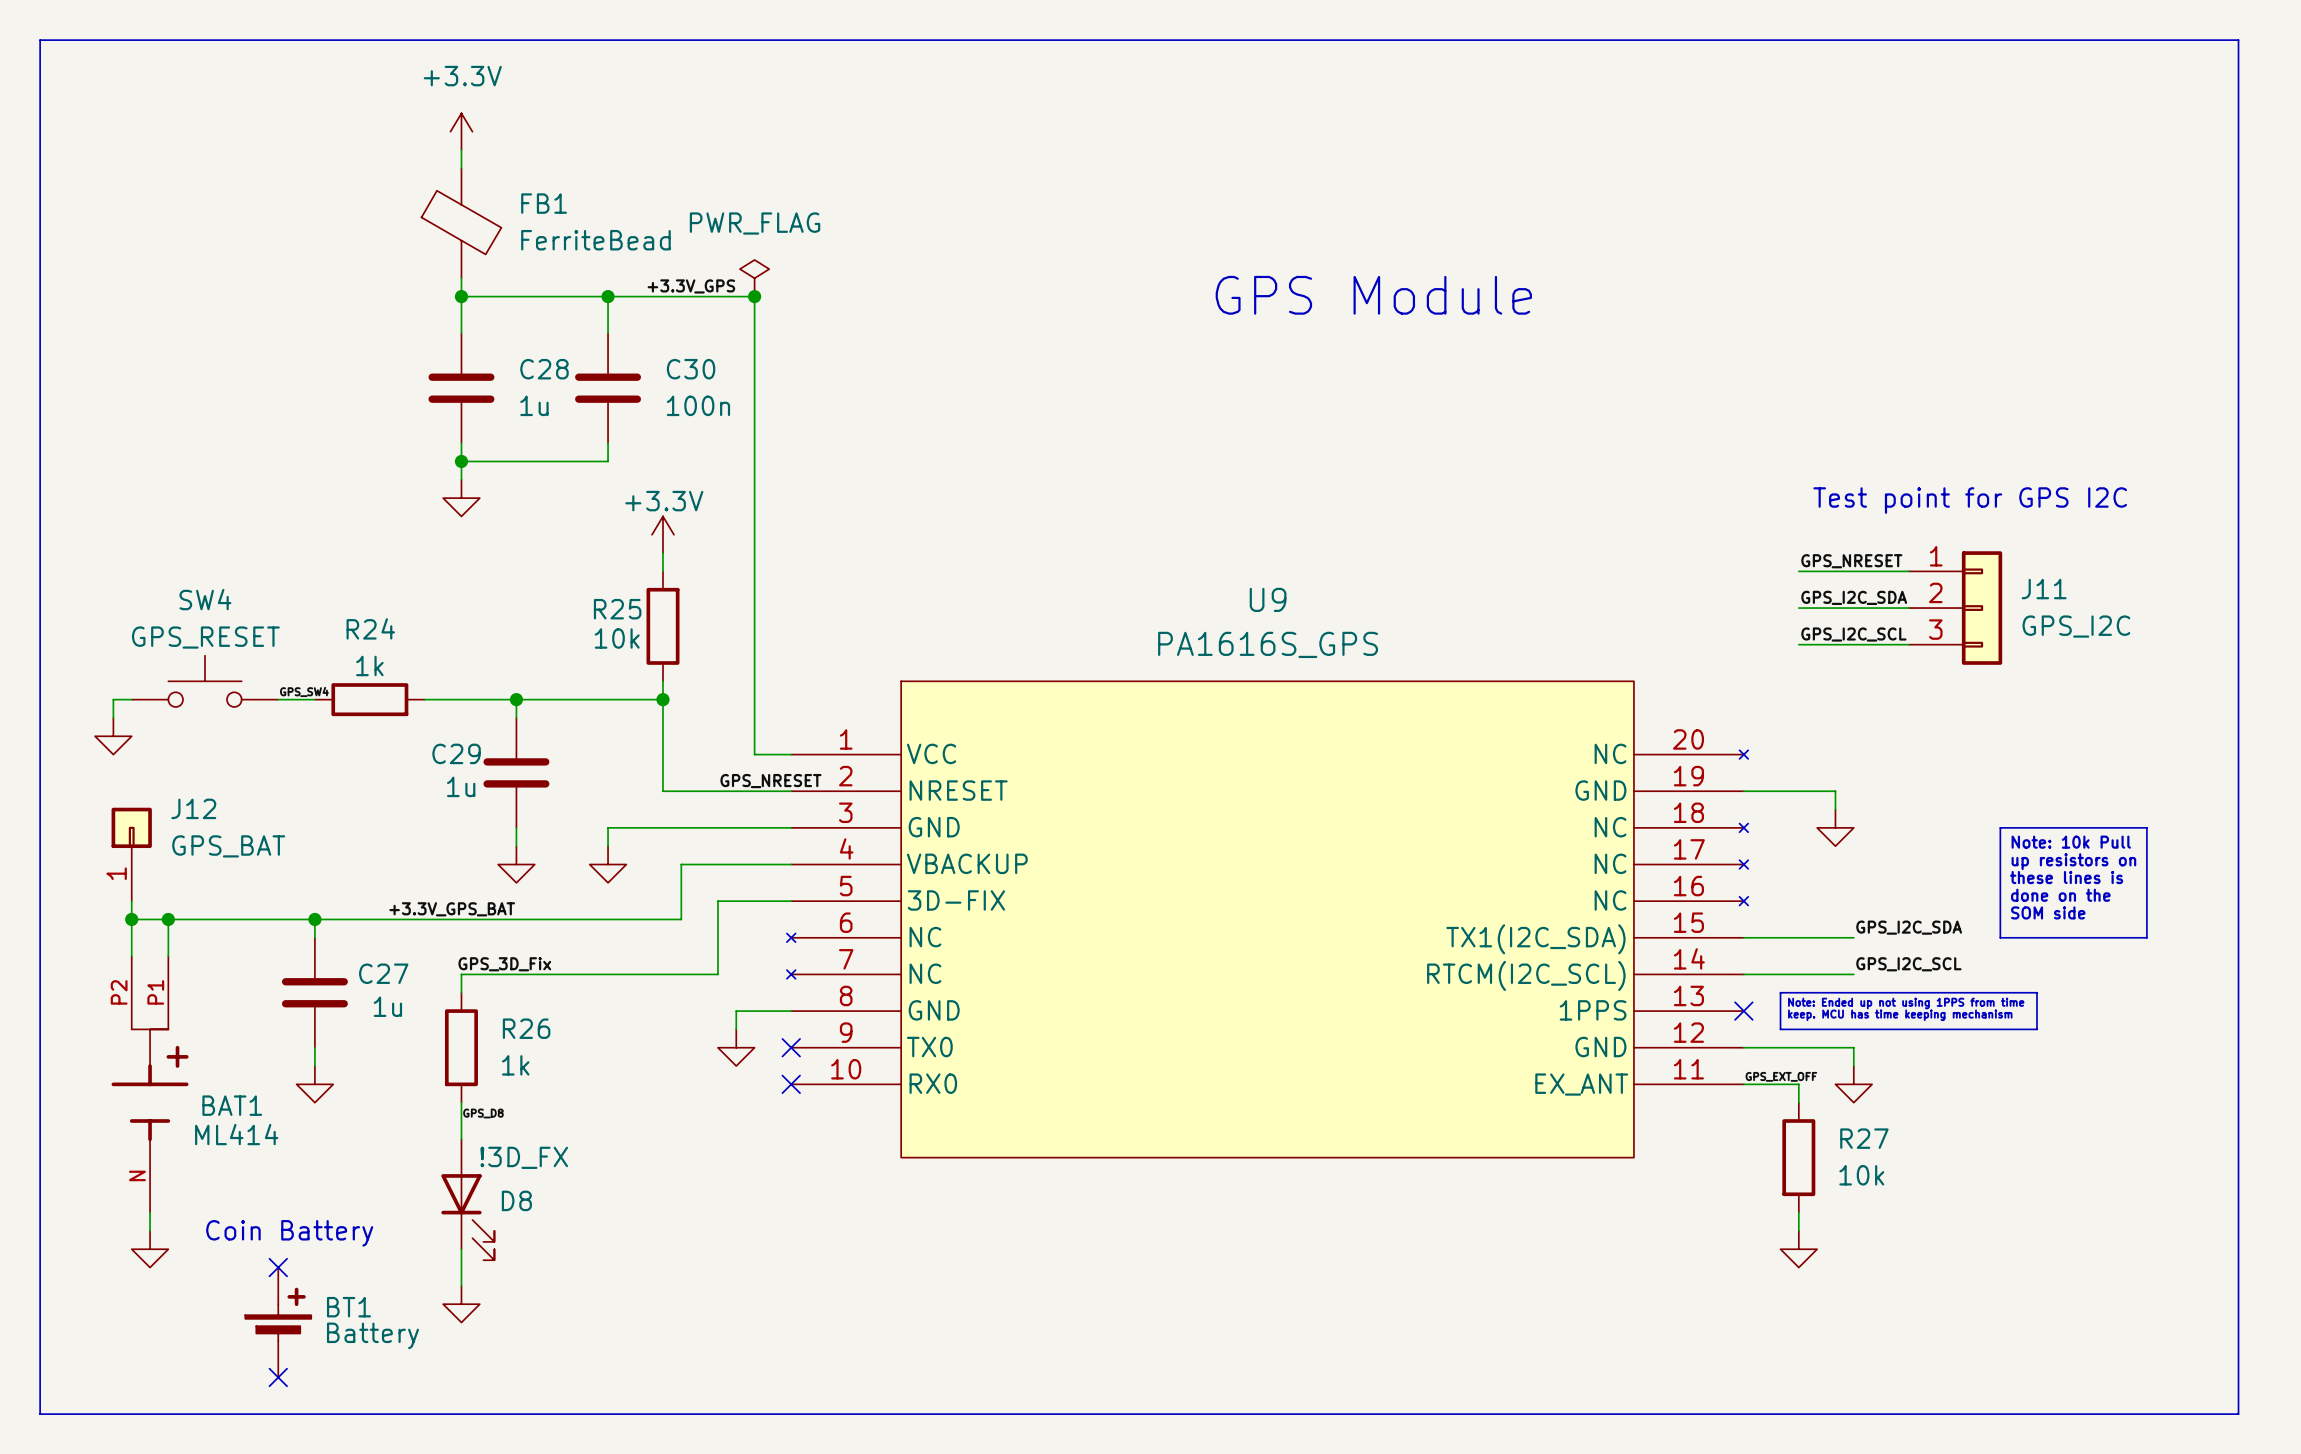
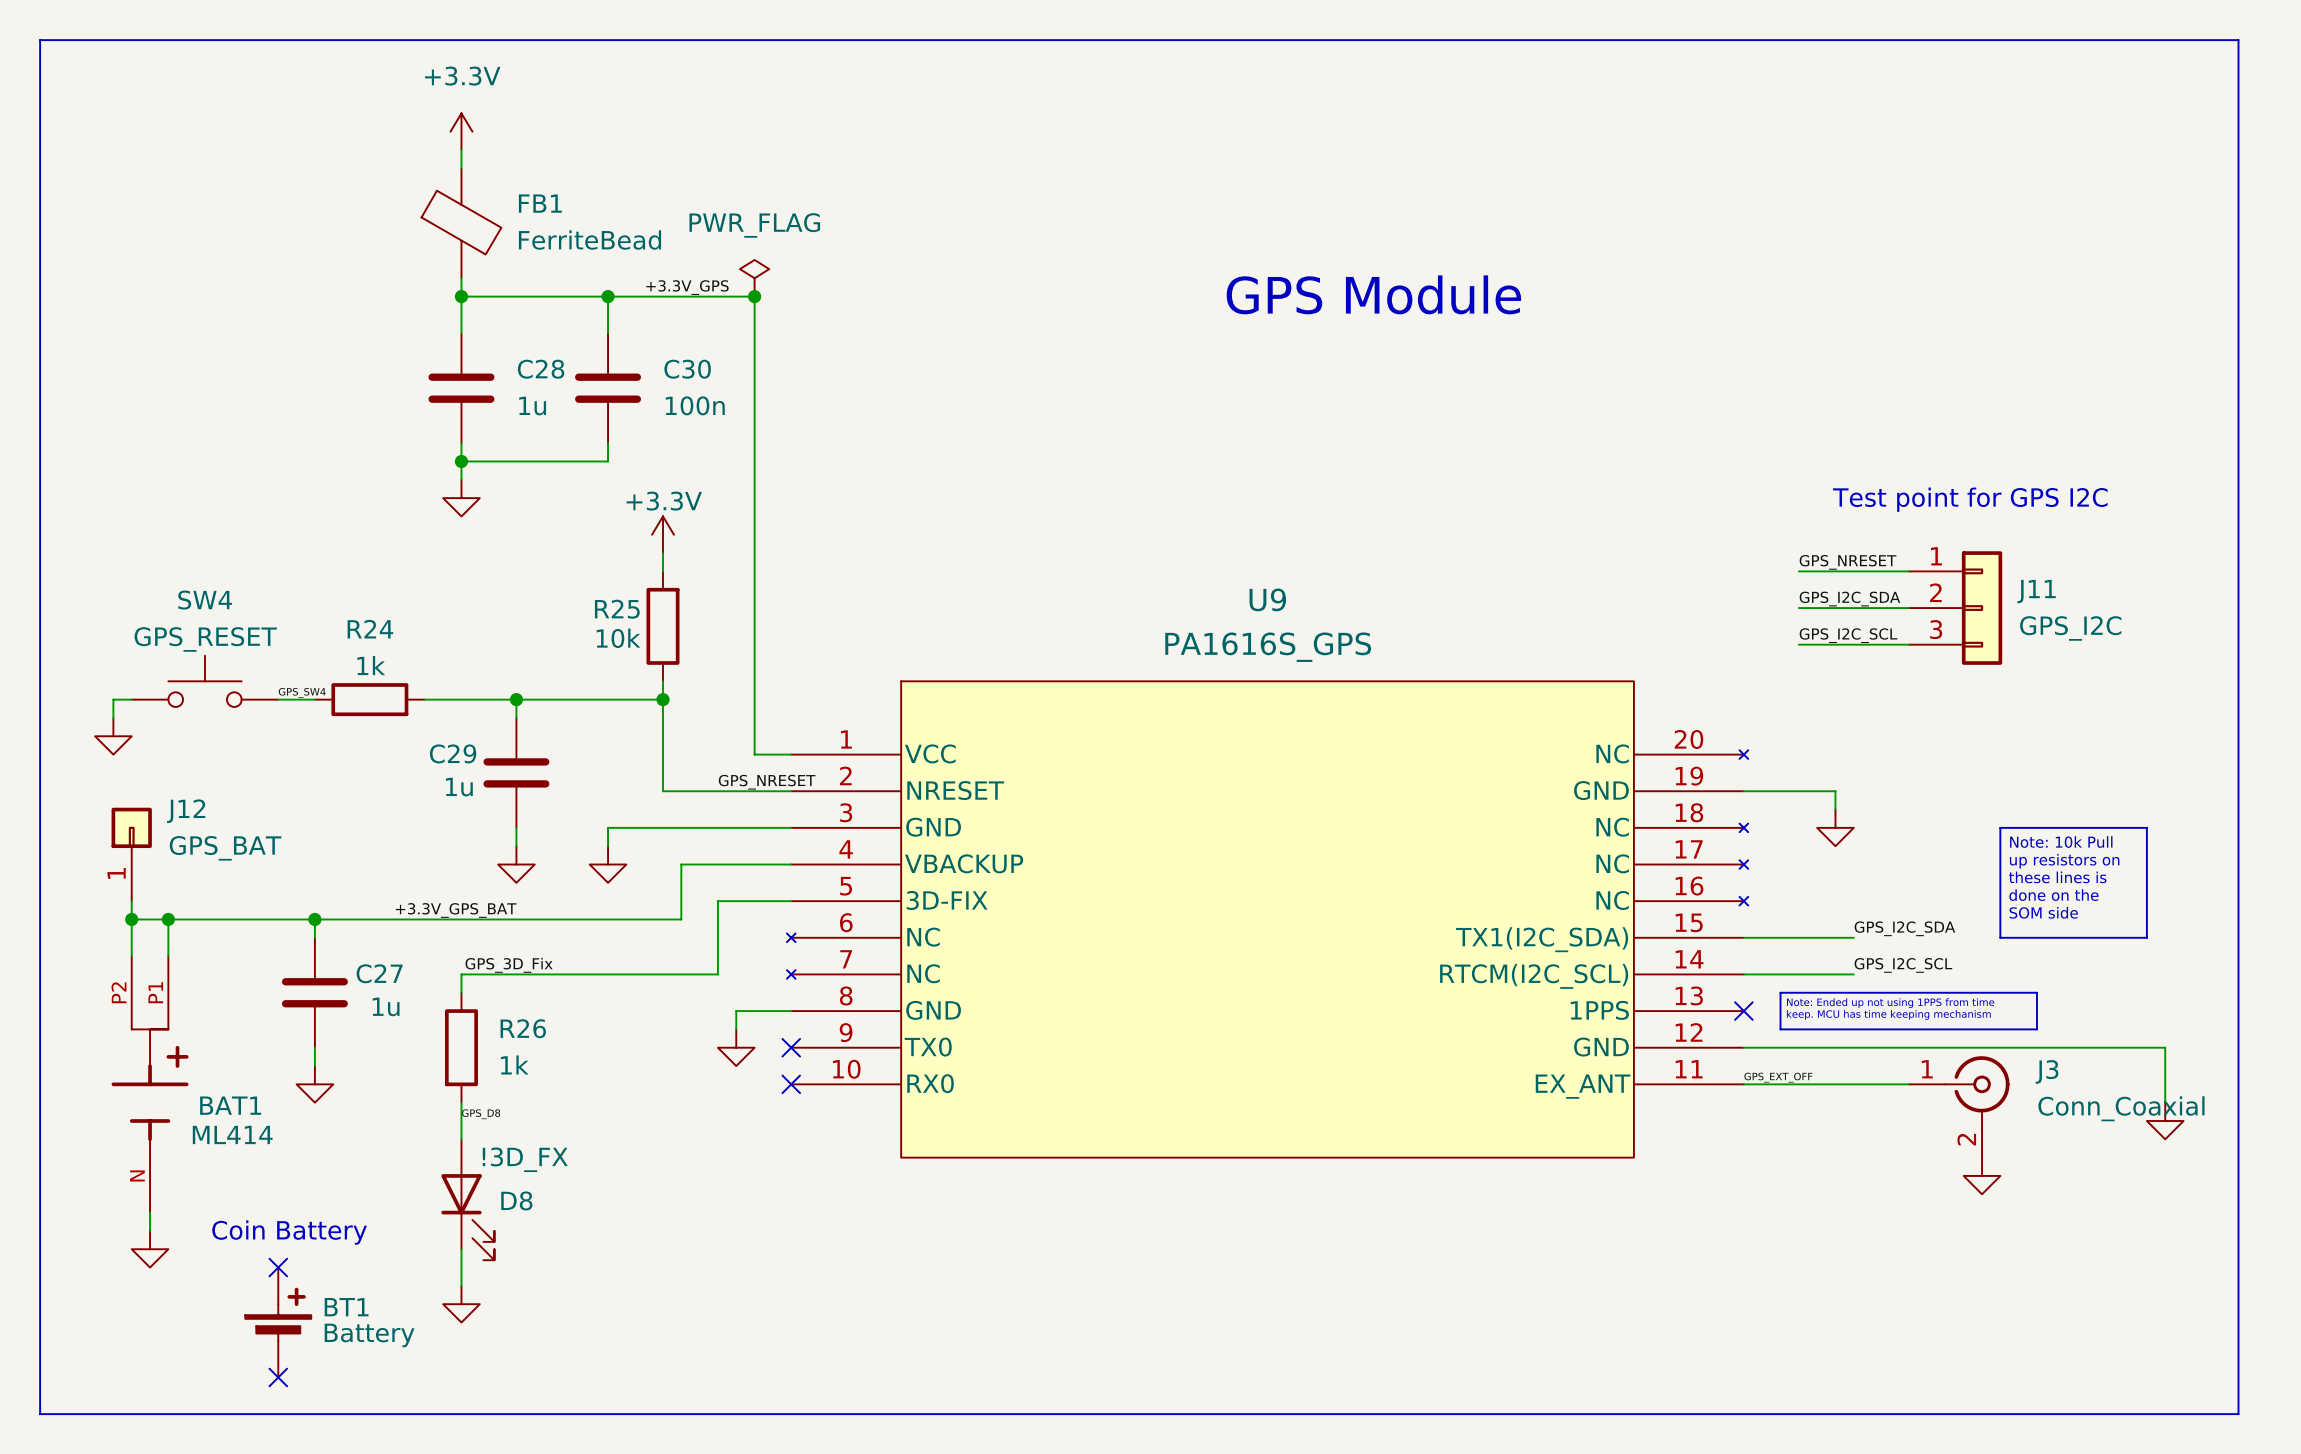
wire: (1853, 1047) (1853, 1066) -> (1853, 1047) (2165, 1047) (2165, 1102)
wire: (1798, 1084) (1798, 1102) -> (1798, 1084) (1908, 1084)
power symbol: (1853, 1084) -> none
J3: none -> Conn_Coaxial (1959, 1106)
power symbol: none -> (2165, 1120)
R27: 10k (1798, 1157) -> none
power symbol: none -> (1982, 1175)
wire: (1798, 1212) (1798, 1230) -> none
power symbol: (1798, 1249) -> none

